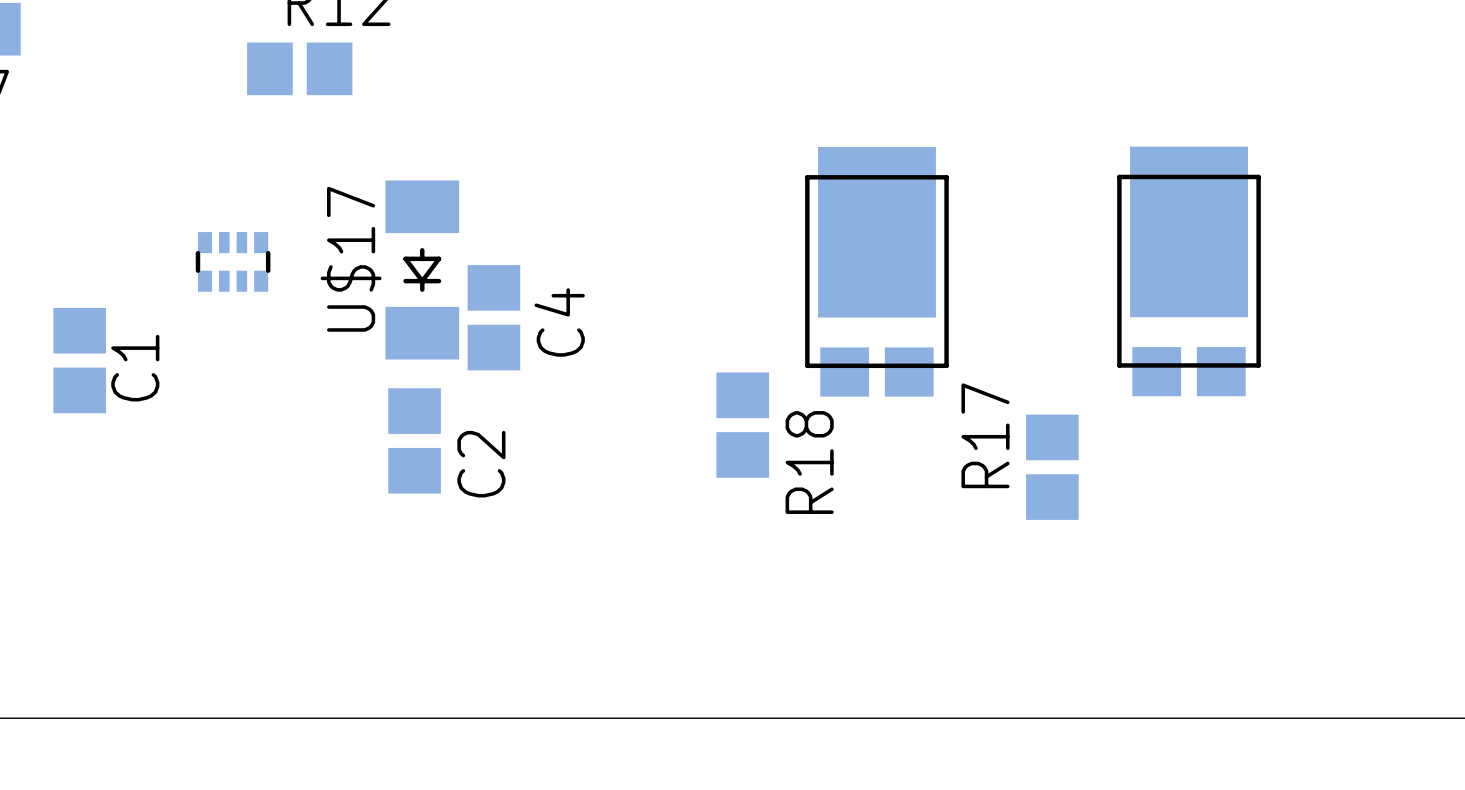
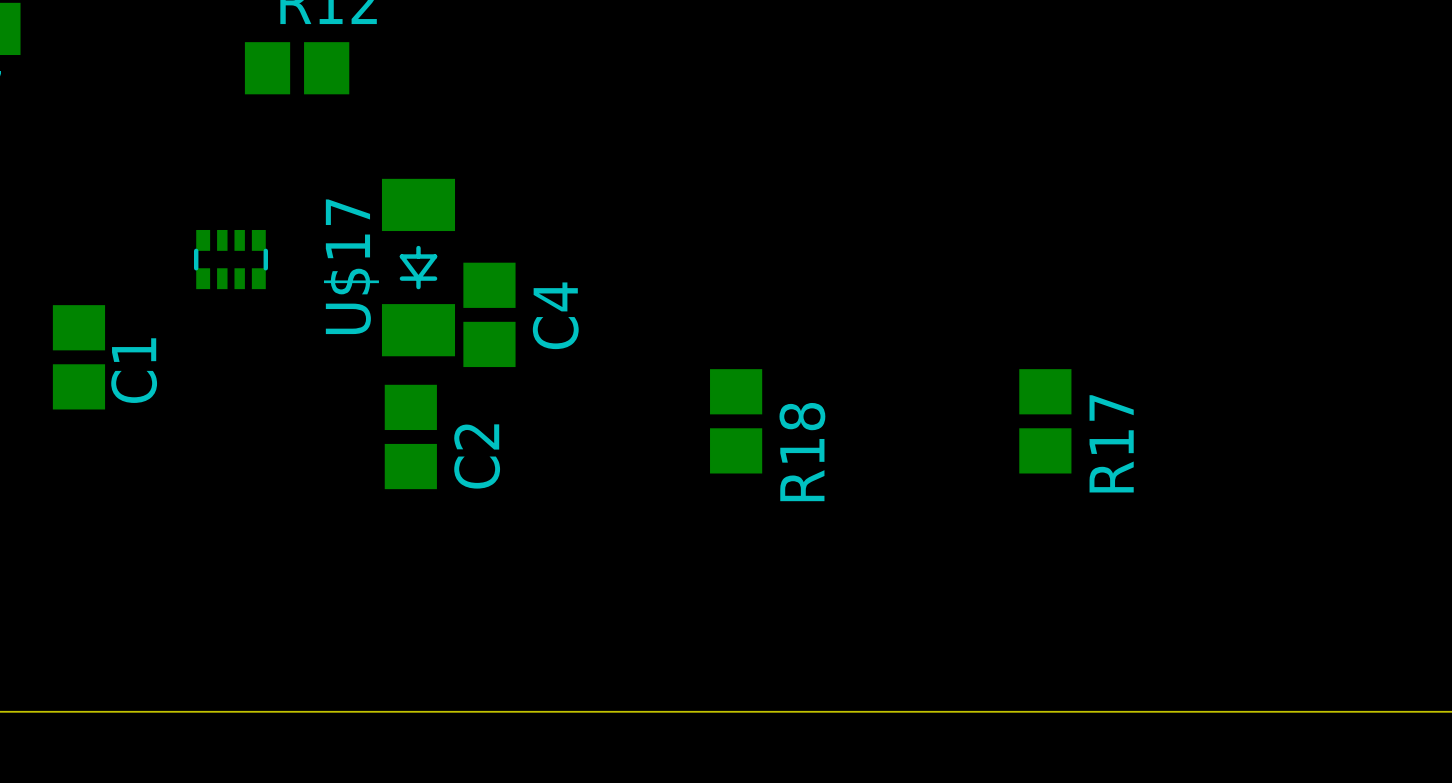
part: (876, 271) -> none
part: (1189, 271) -> none
R17 name position: R17 (985, 435) -> R17 (1111, 443)
R17 position: (1052, 467) -> (1045, 421)

